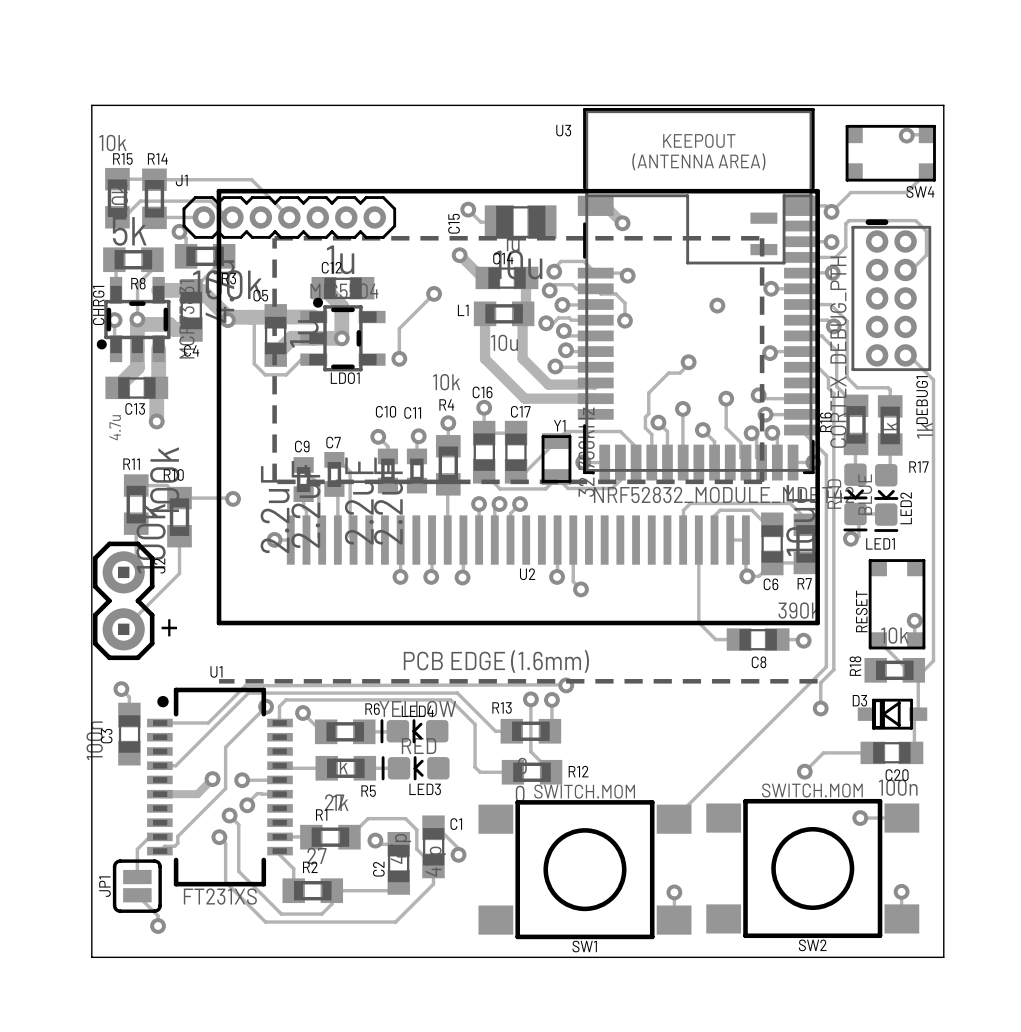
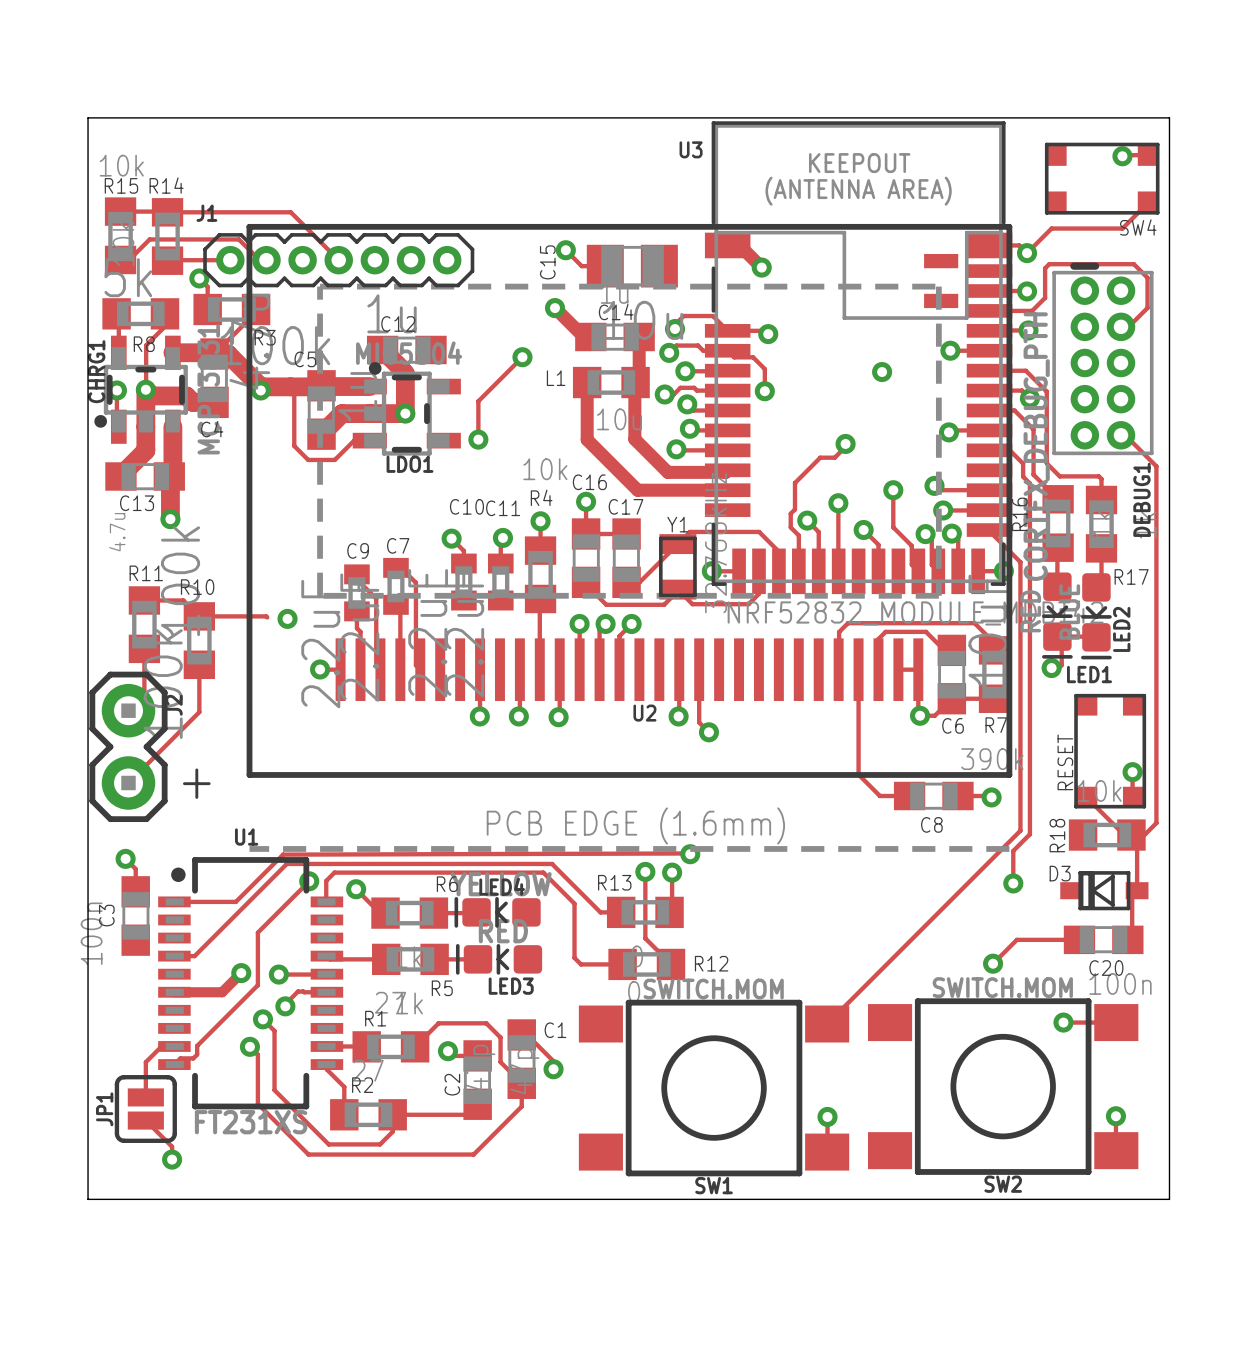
via position: (233, 498) -> (287, 618)

